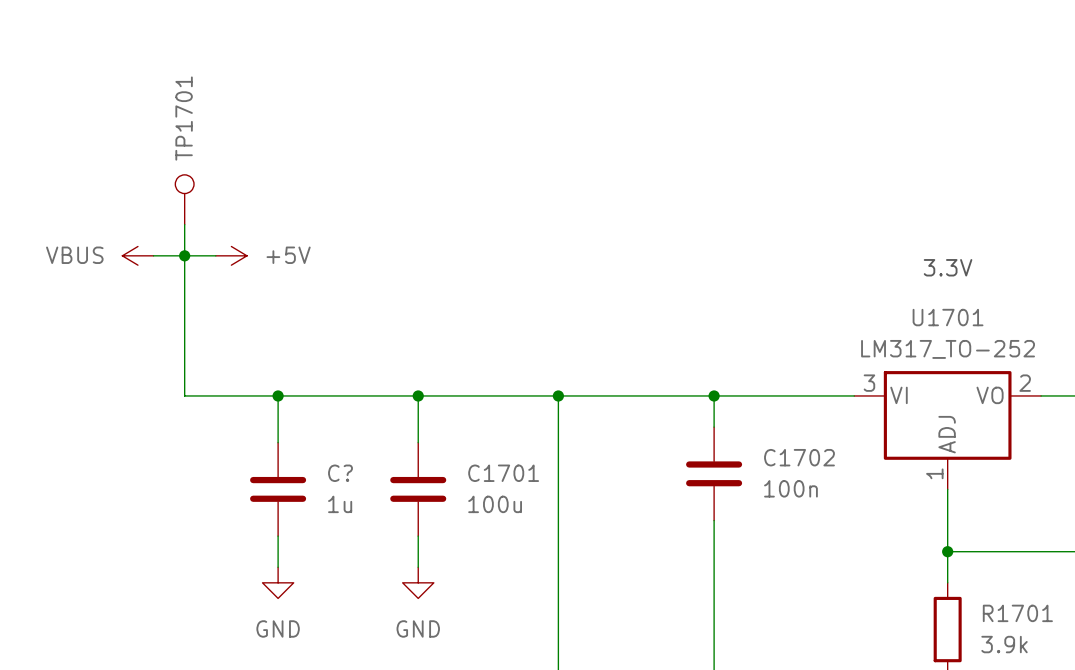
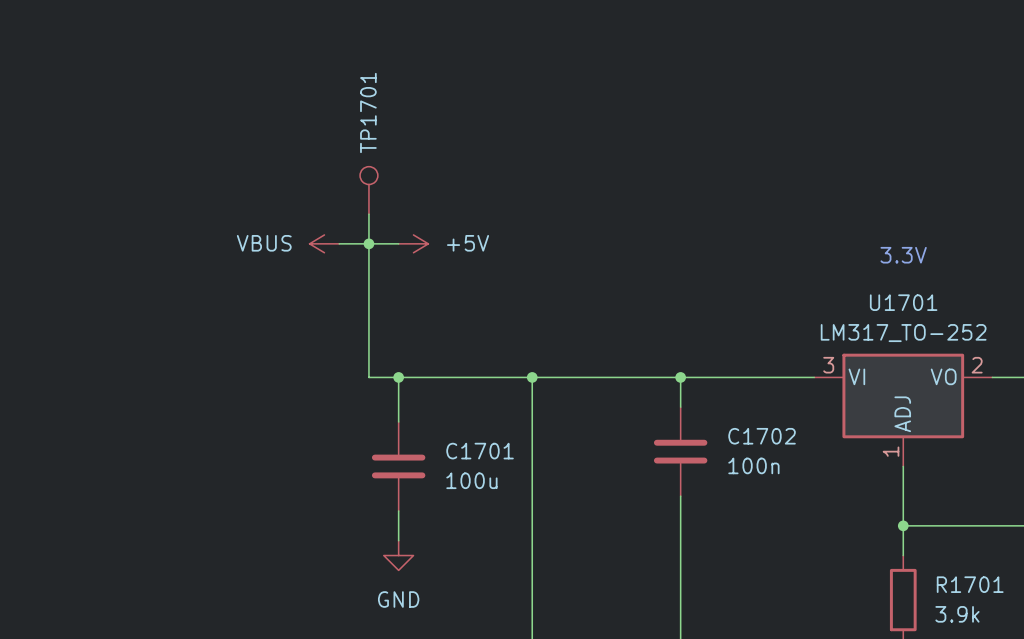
TP1701 position: (184, 199) -> (368, 190)
wire: (184, 224) (184, 395) (387, 395) -> (368, 214) (368, 377)
power symbol position: VBUS (137, 255) -> VBUS (324, 243)
wire: (153, 255) (215, 255) -> (339, 243) (398, 243)
junction: (184, 255) -> none
power symbol position: +5V (231, 255) -> +5V (413, 243)
junction: none -> (368, 243)
wire: (278, 395) (278, 442) -> none
junction: (278, 395) -> none
C?: 1u (278, 489) -> none
wire: (278, 536) (278, 567) -> none
power symbol: GND (278, 582) -> none

